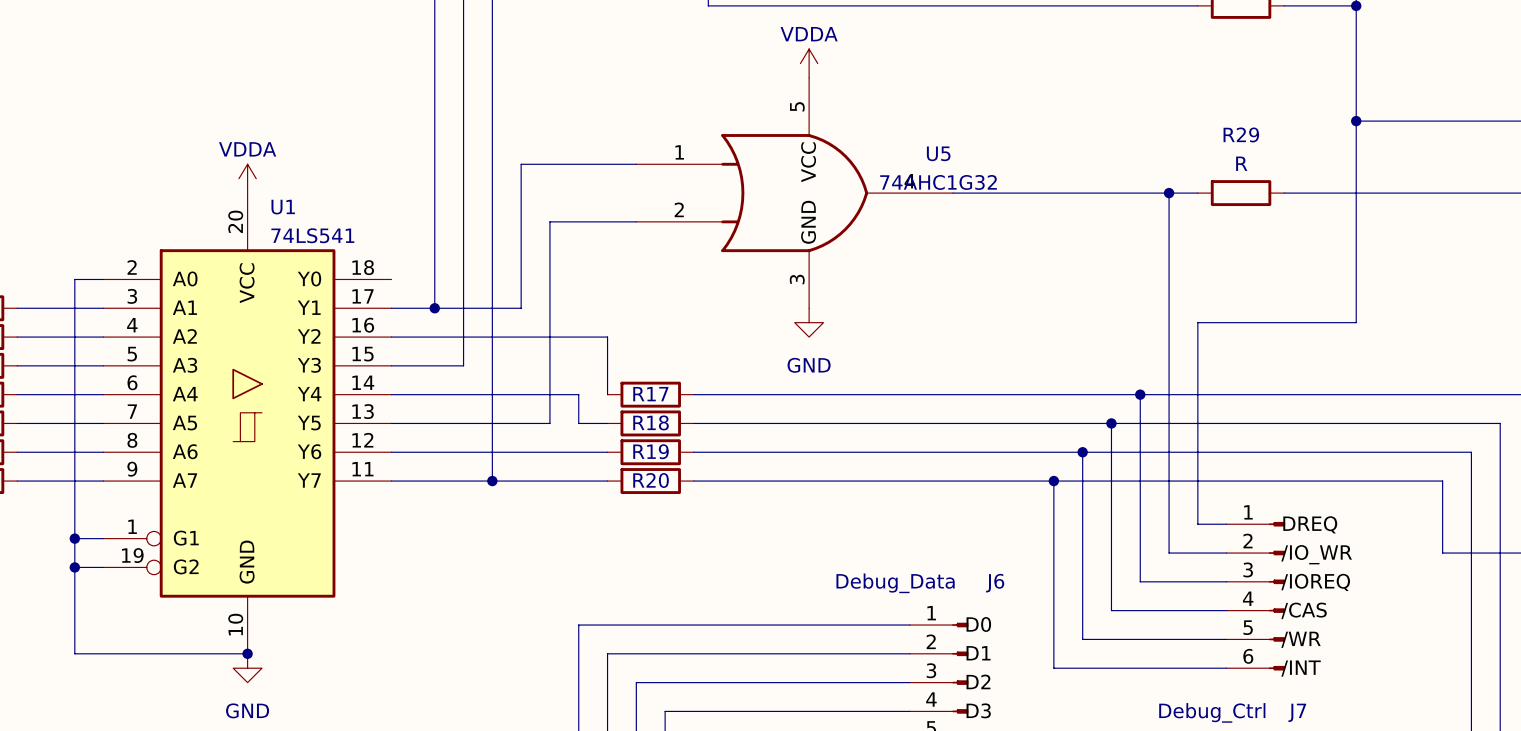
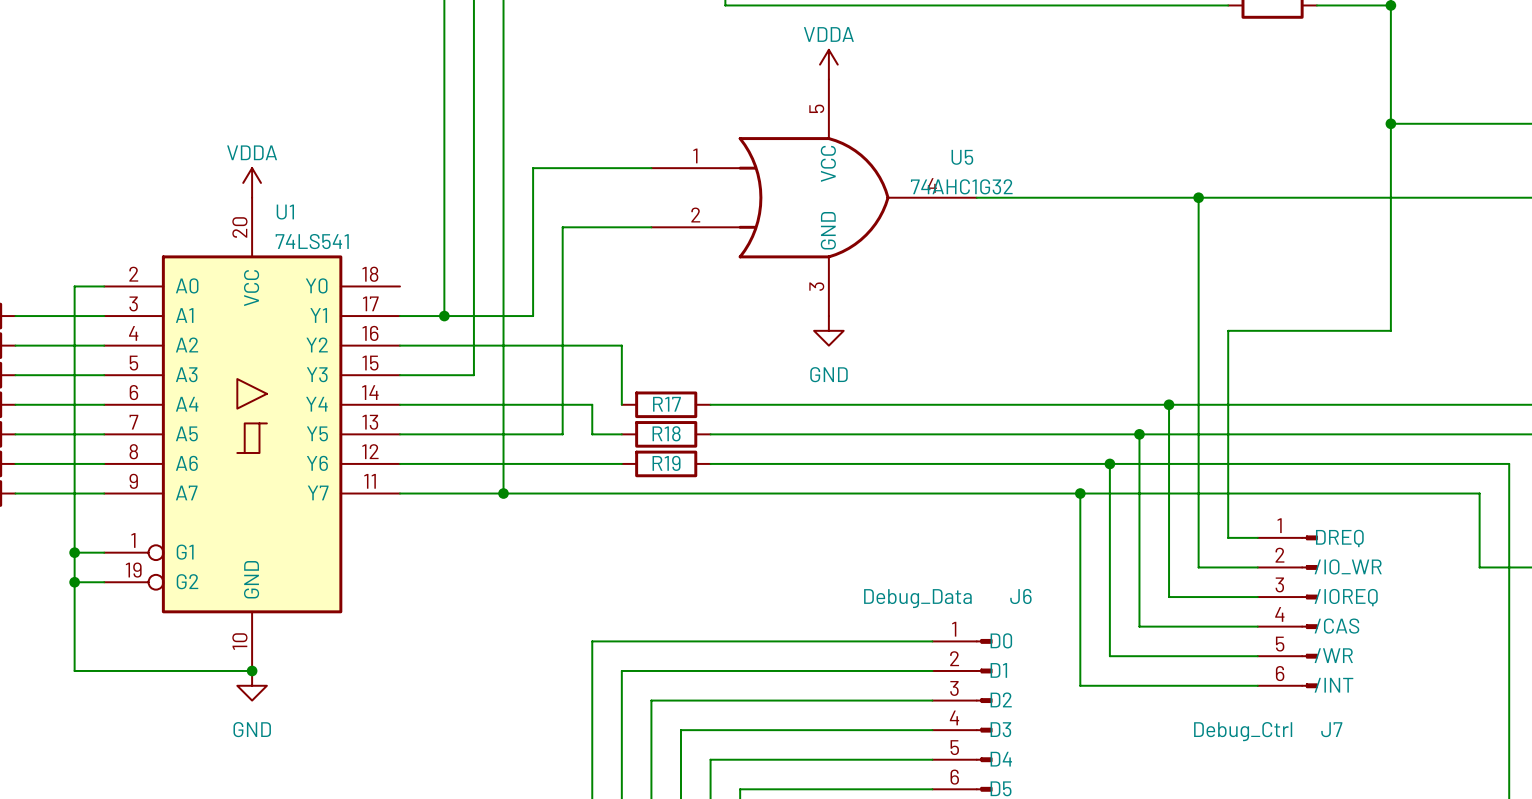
wire: none -> (1228, 197) (1316, 197)
R29: R (1241, 193) -> none
wire: none -> (621, 493) (710, 493)
R20: (650, 481) -> none

